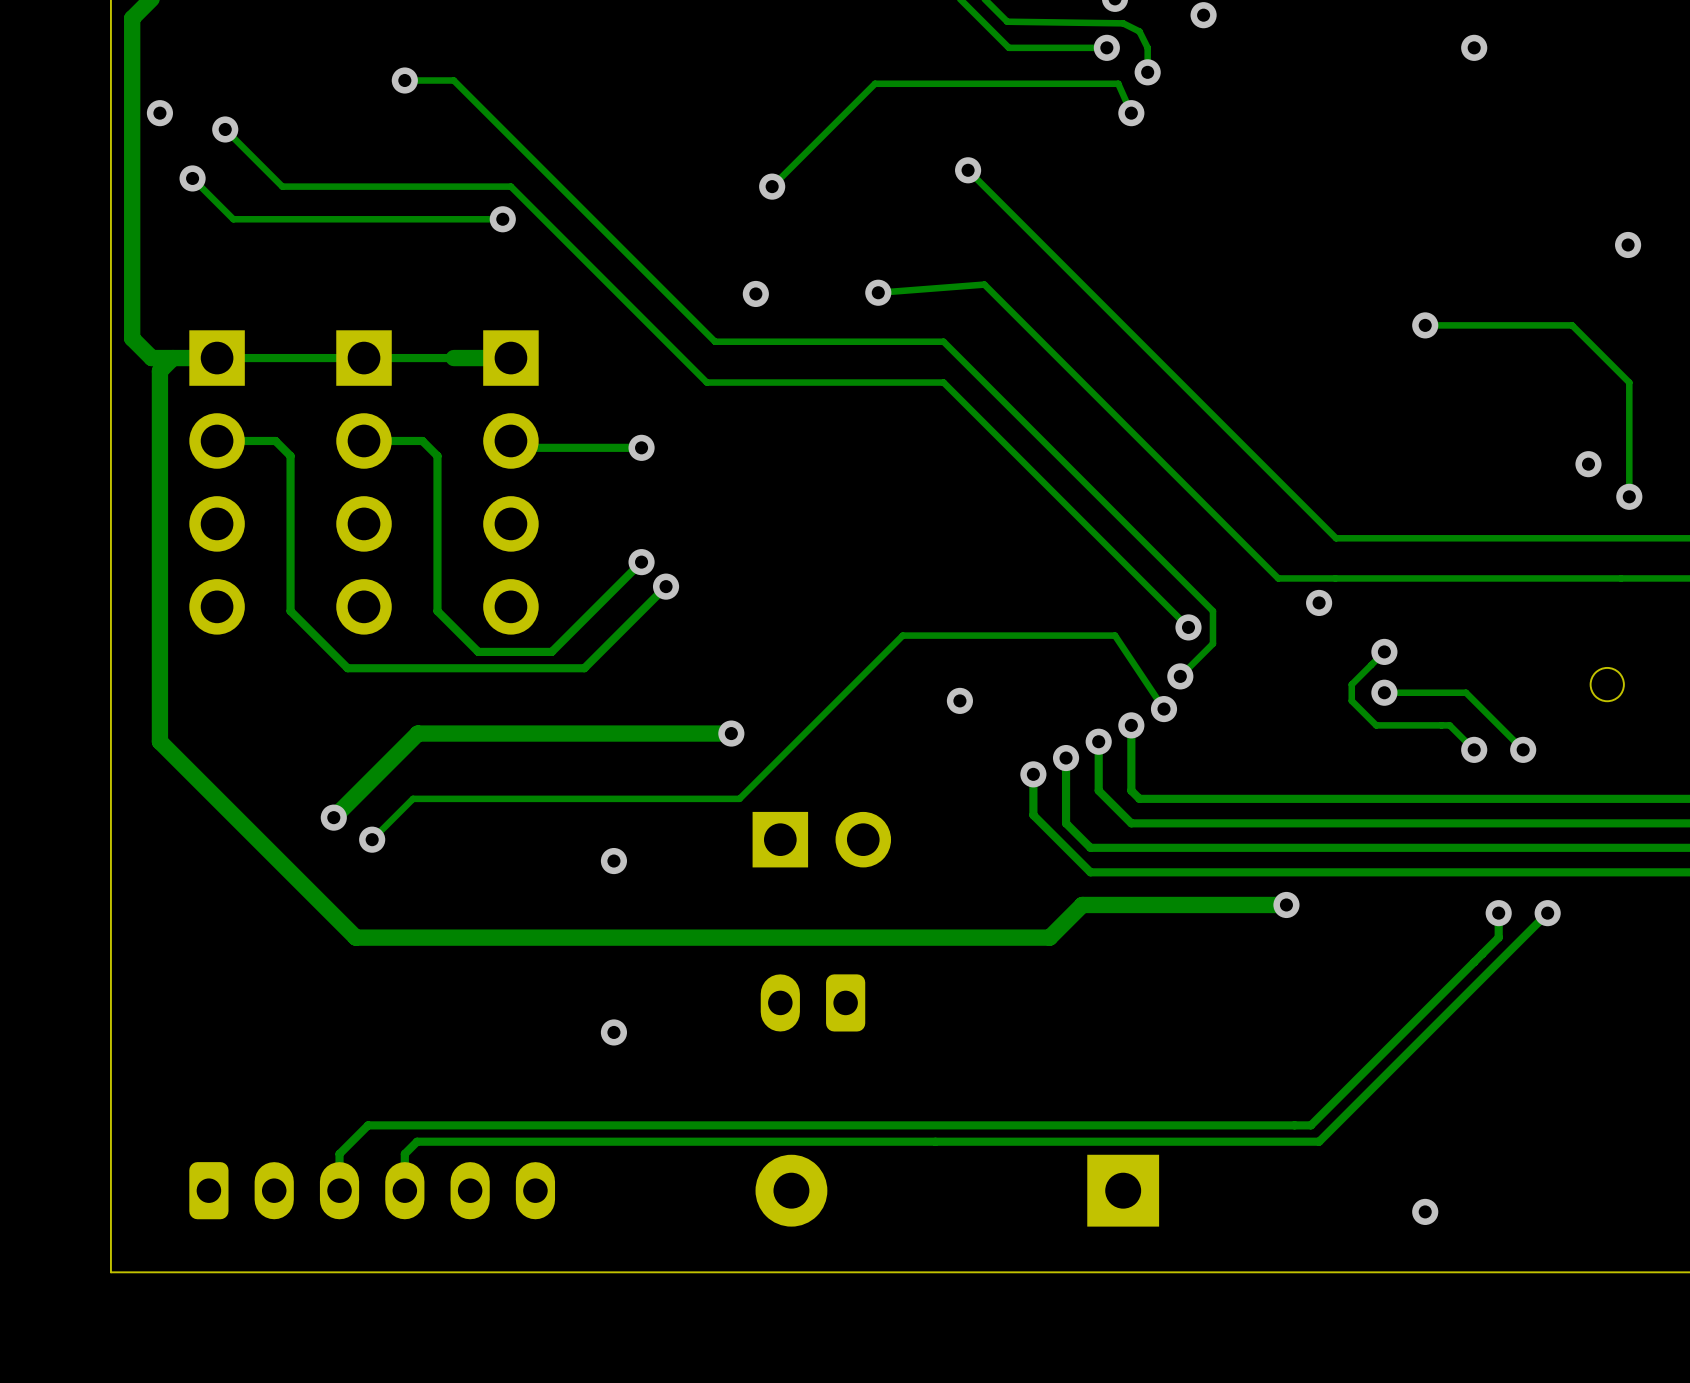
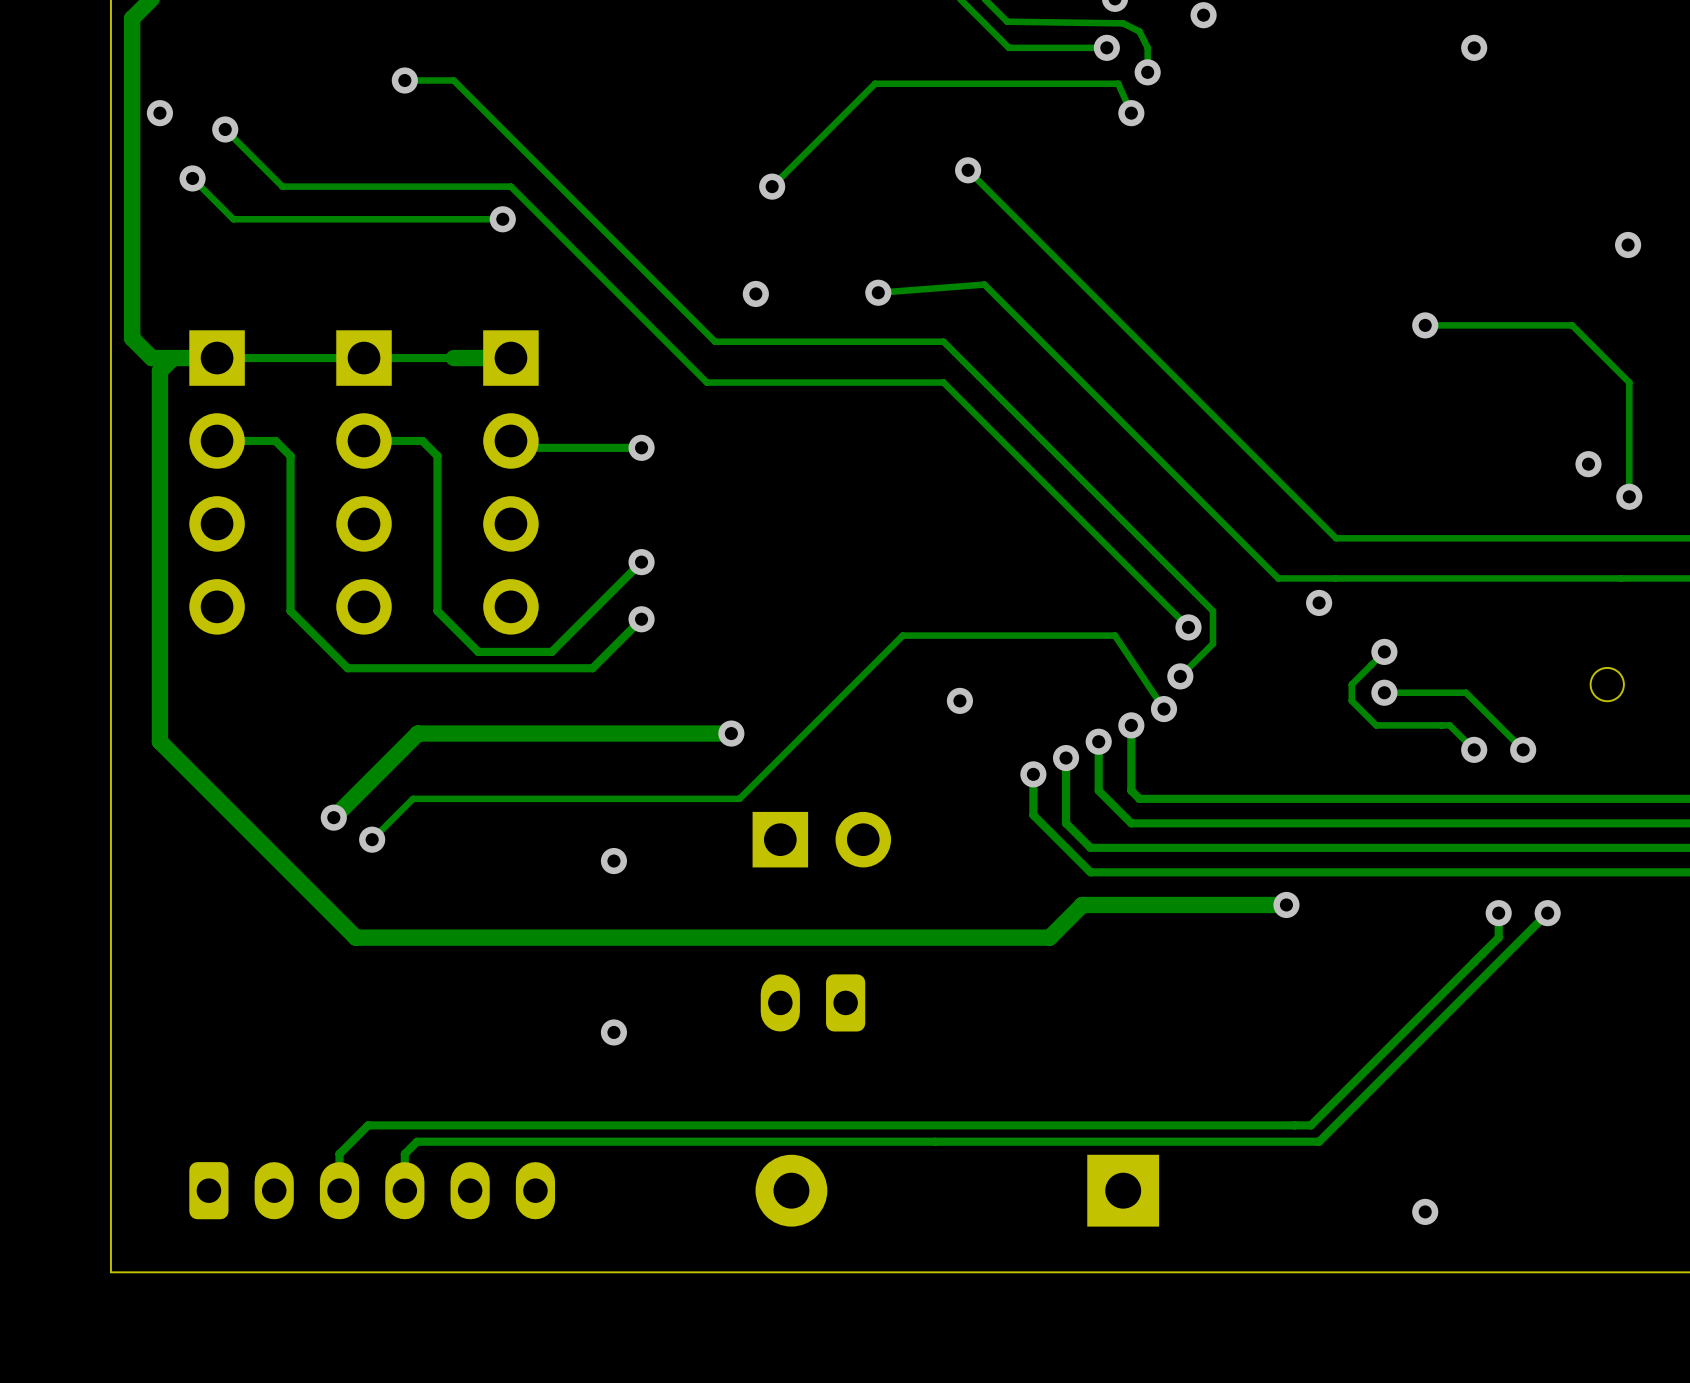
track: (666, 586) (584, 668) -> (641, 619) (592, 668) (584, 668)
via position: (666, 586) -> (641, 619)

